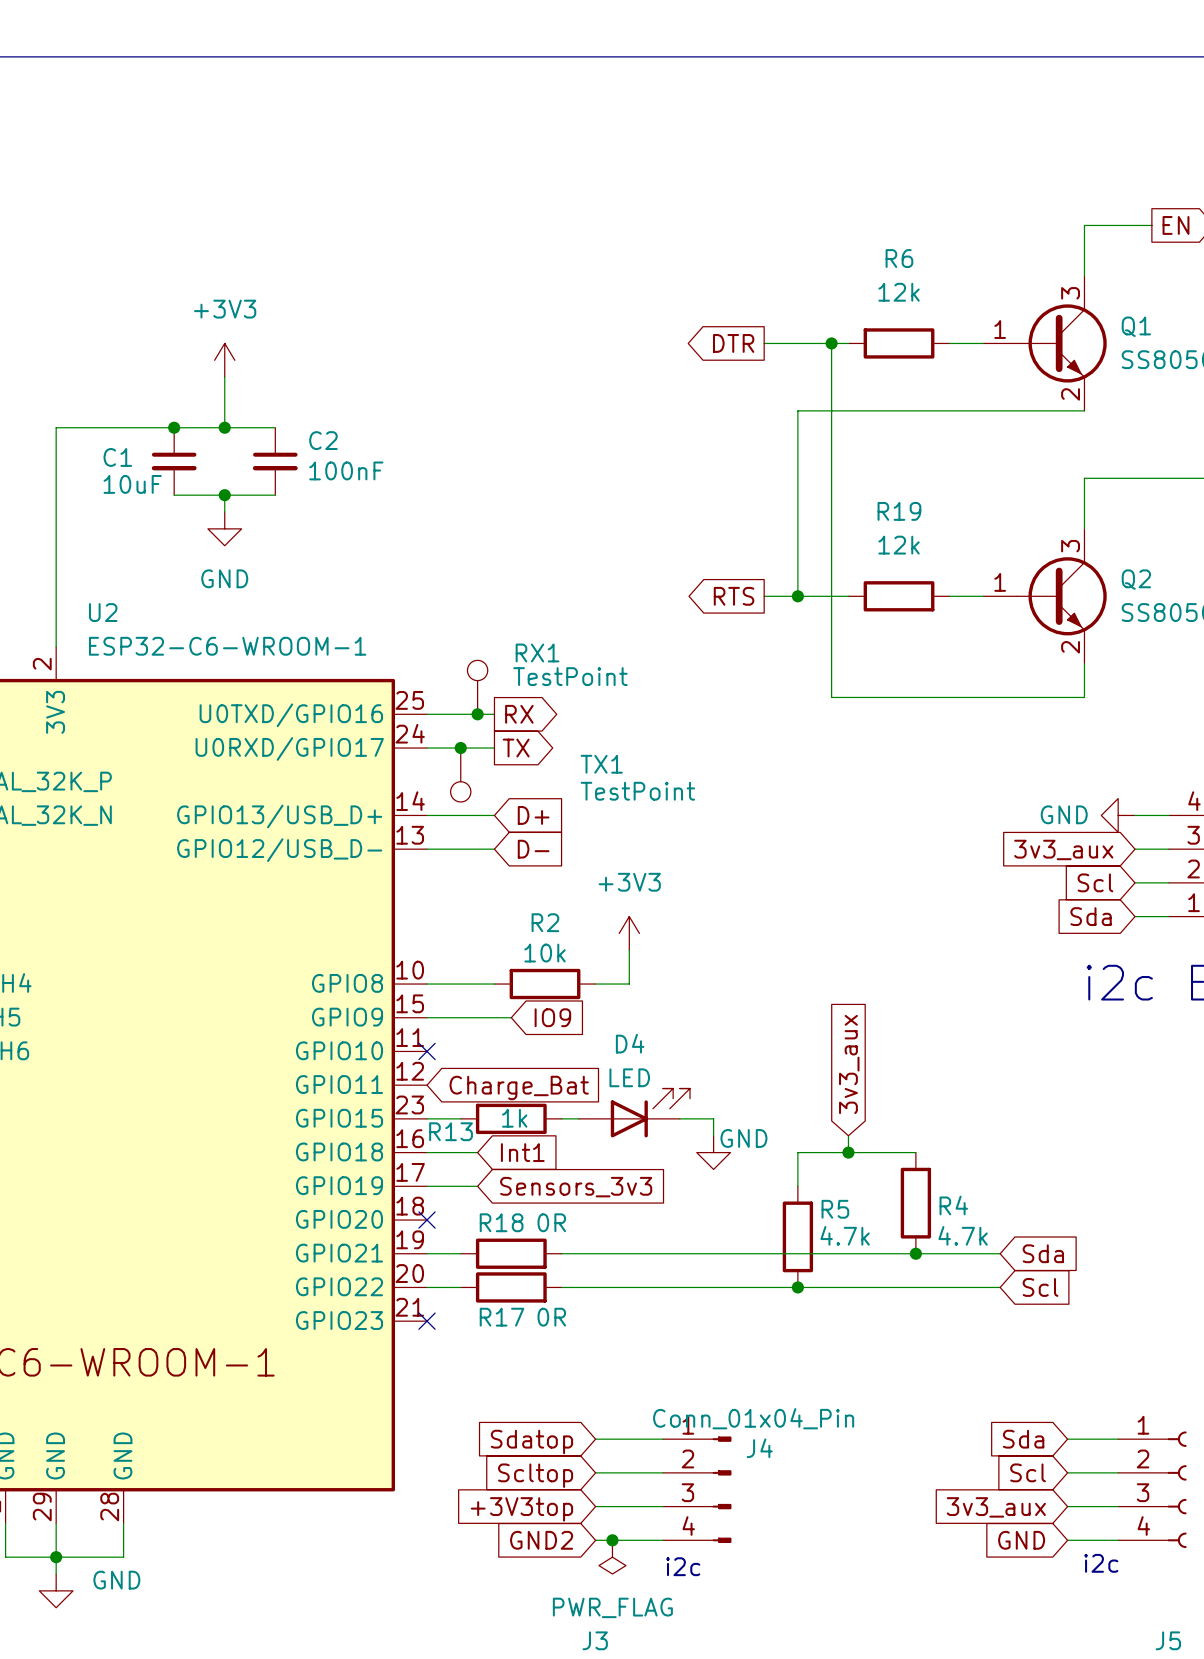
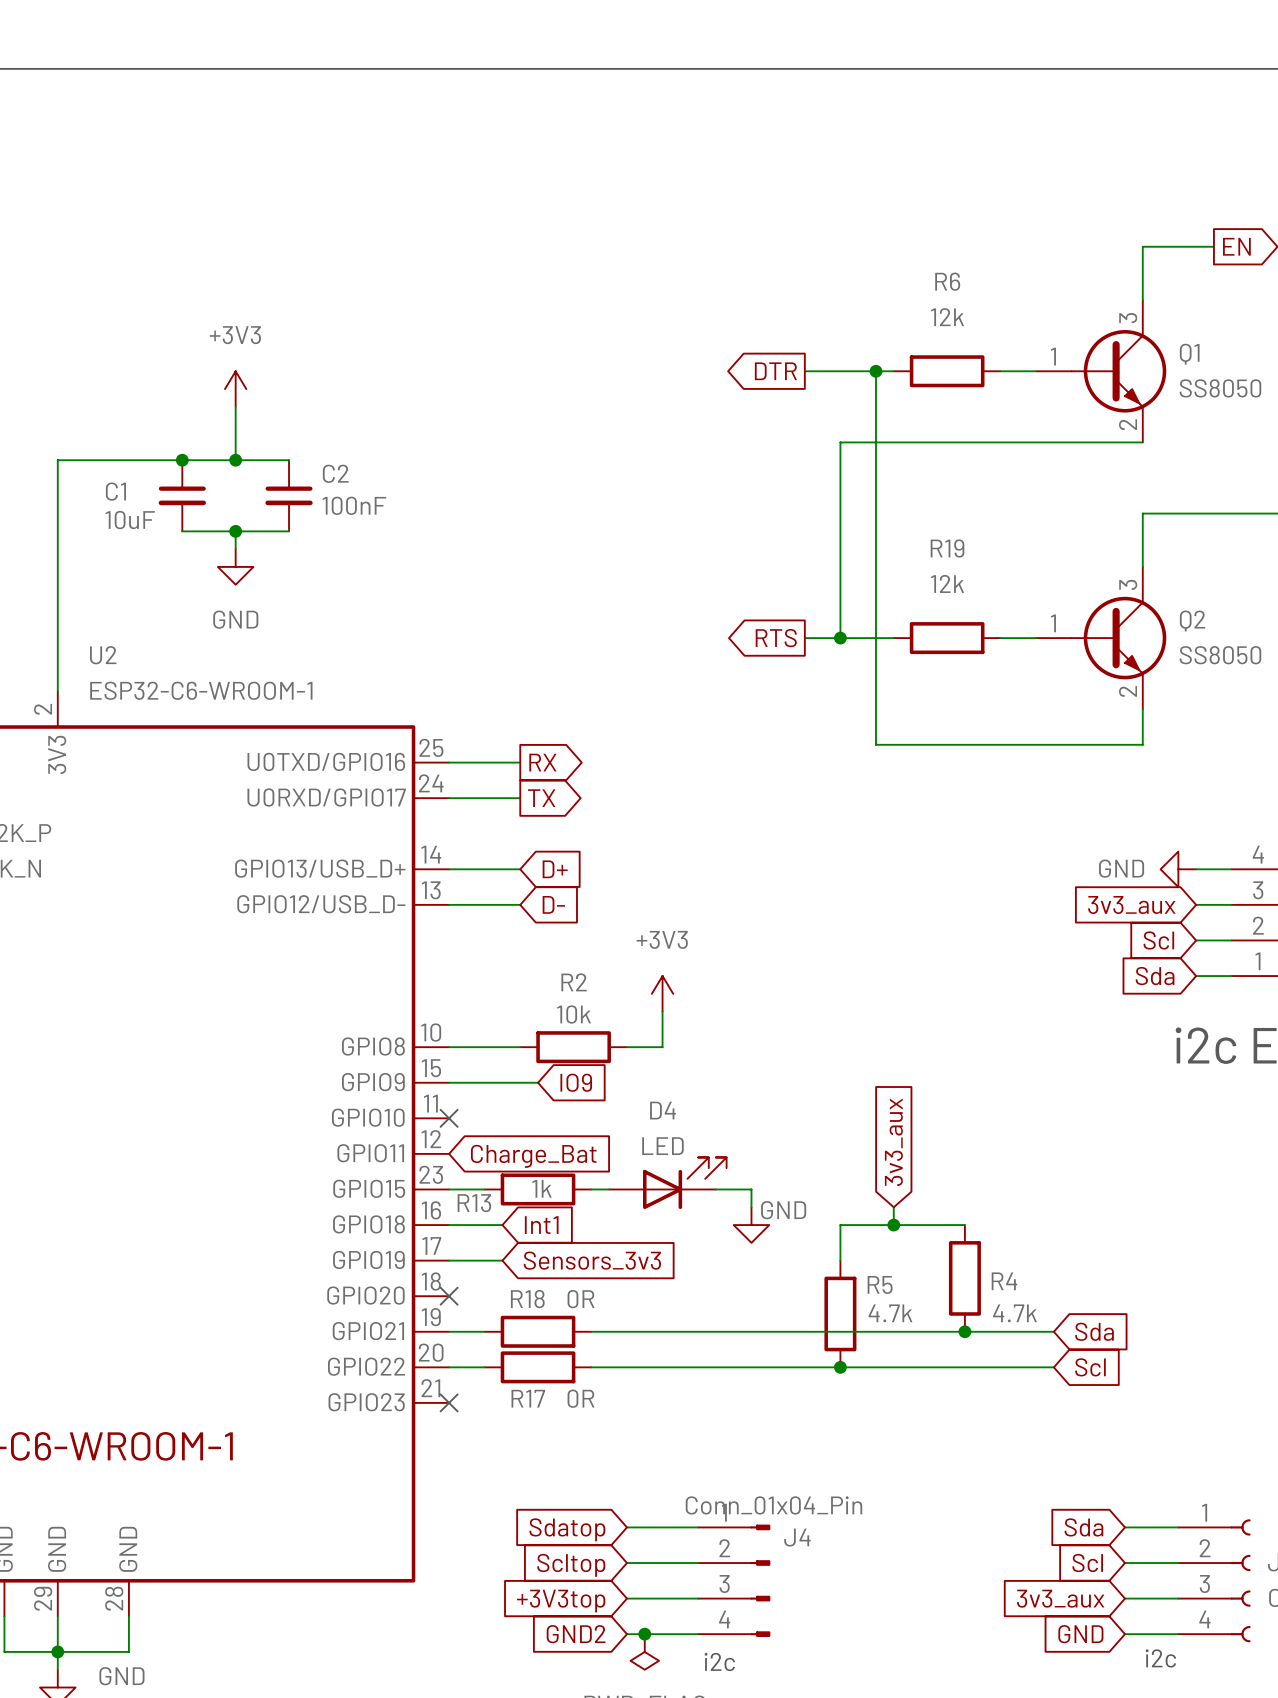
RX1: TestPoint (477, 687) -> none
junction: (477, 714) -> none
junction: (460, 748) -> none
TX1: TestPoint (460, 774) -> none

